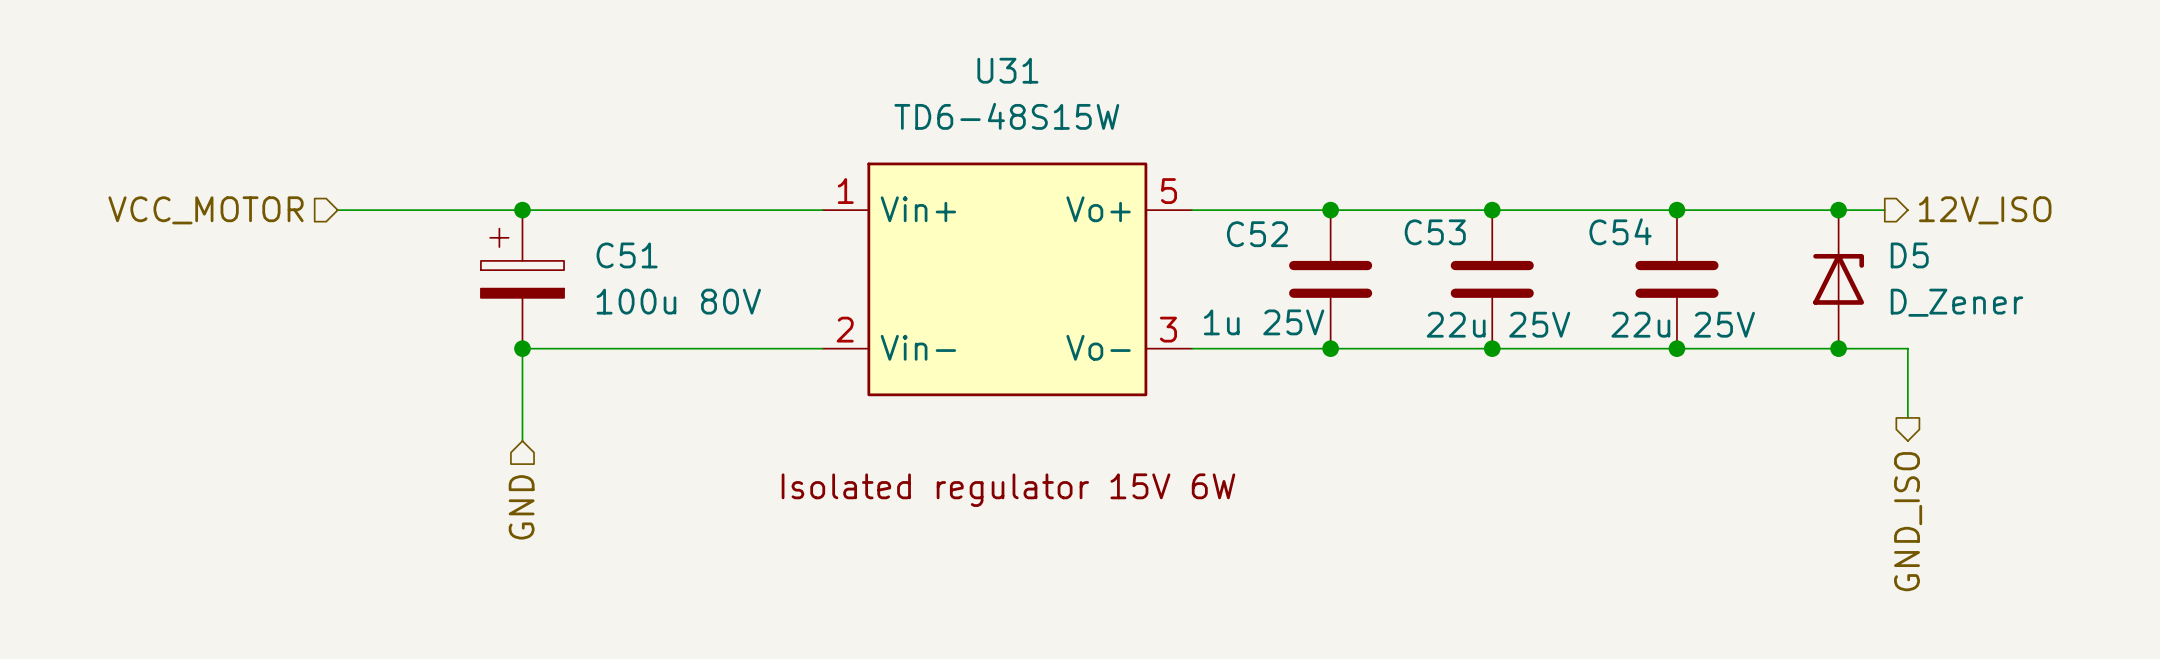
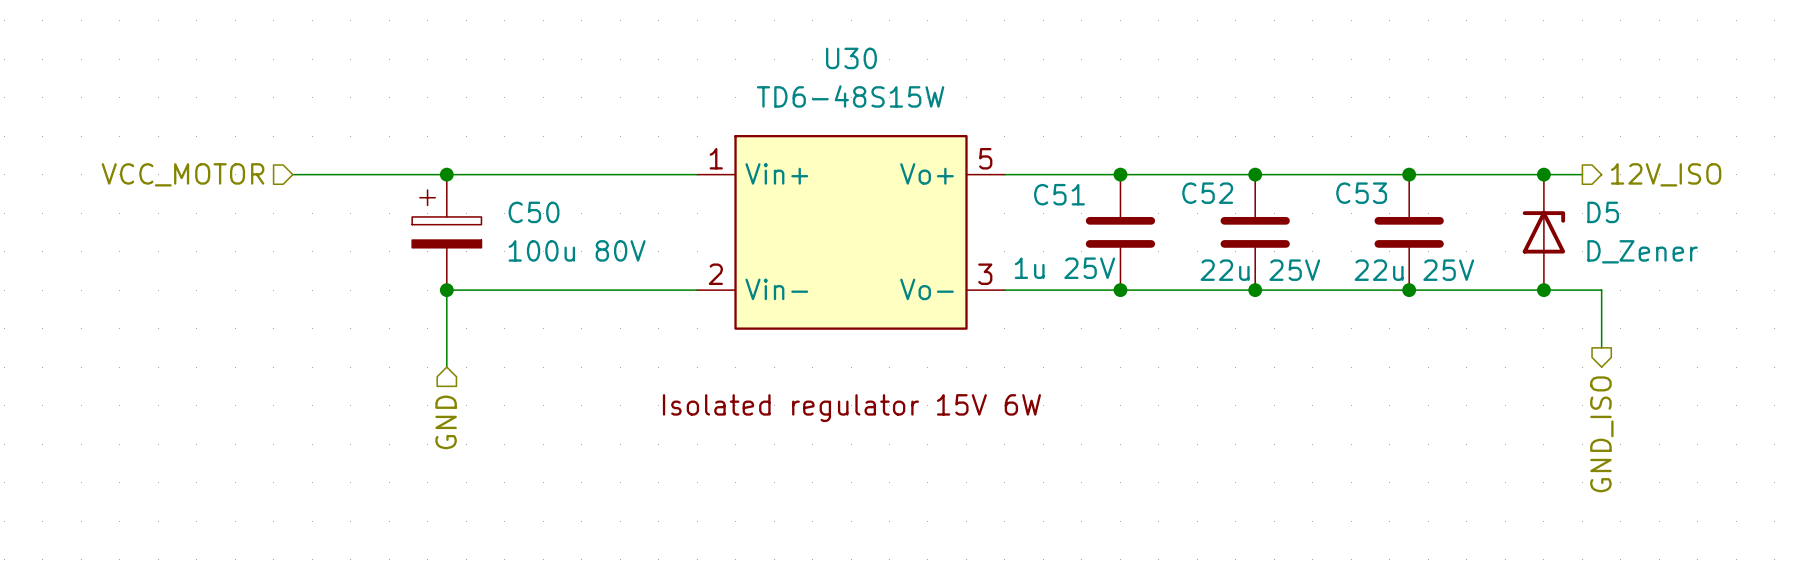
U31 name: U31 (1007, 70) -> U30 (851, 58)
C54 name: C54 (1620, 231) -> C53 (1361, 193)
C53 name: C53 (1435, 232) -> C52 (1207, 193)
C52 name: C52 (1257, 234) -> C51 (1059, 194)
C51 name: C51 (627, 255) -> C50 (534, 212)

